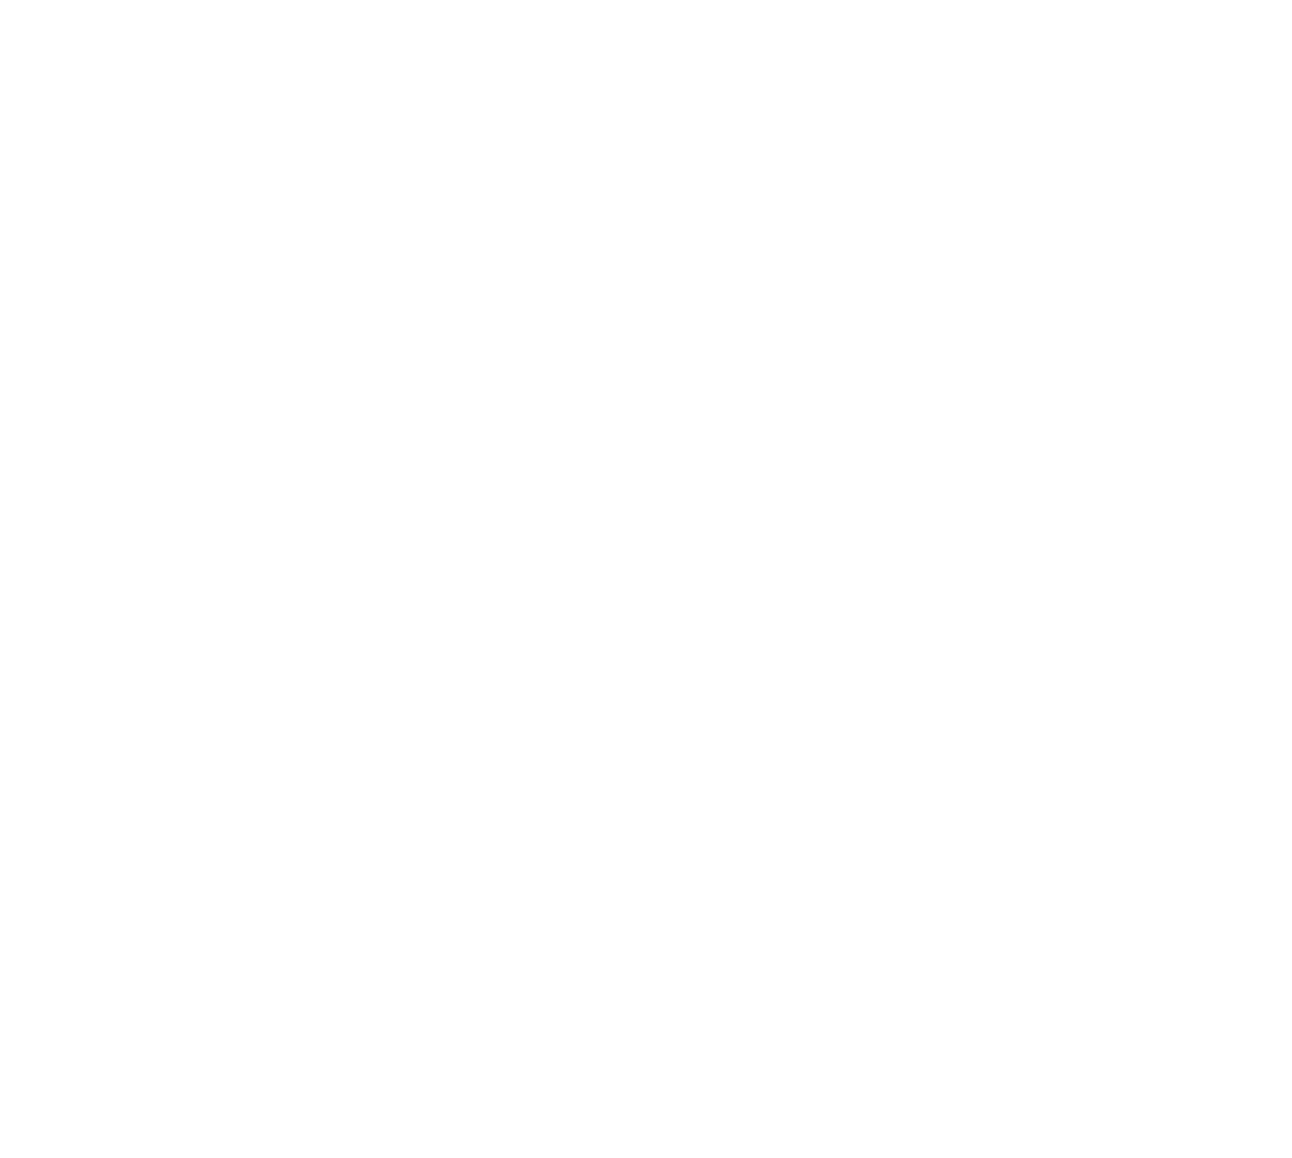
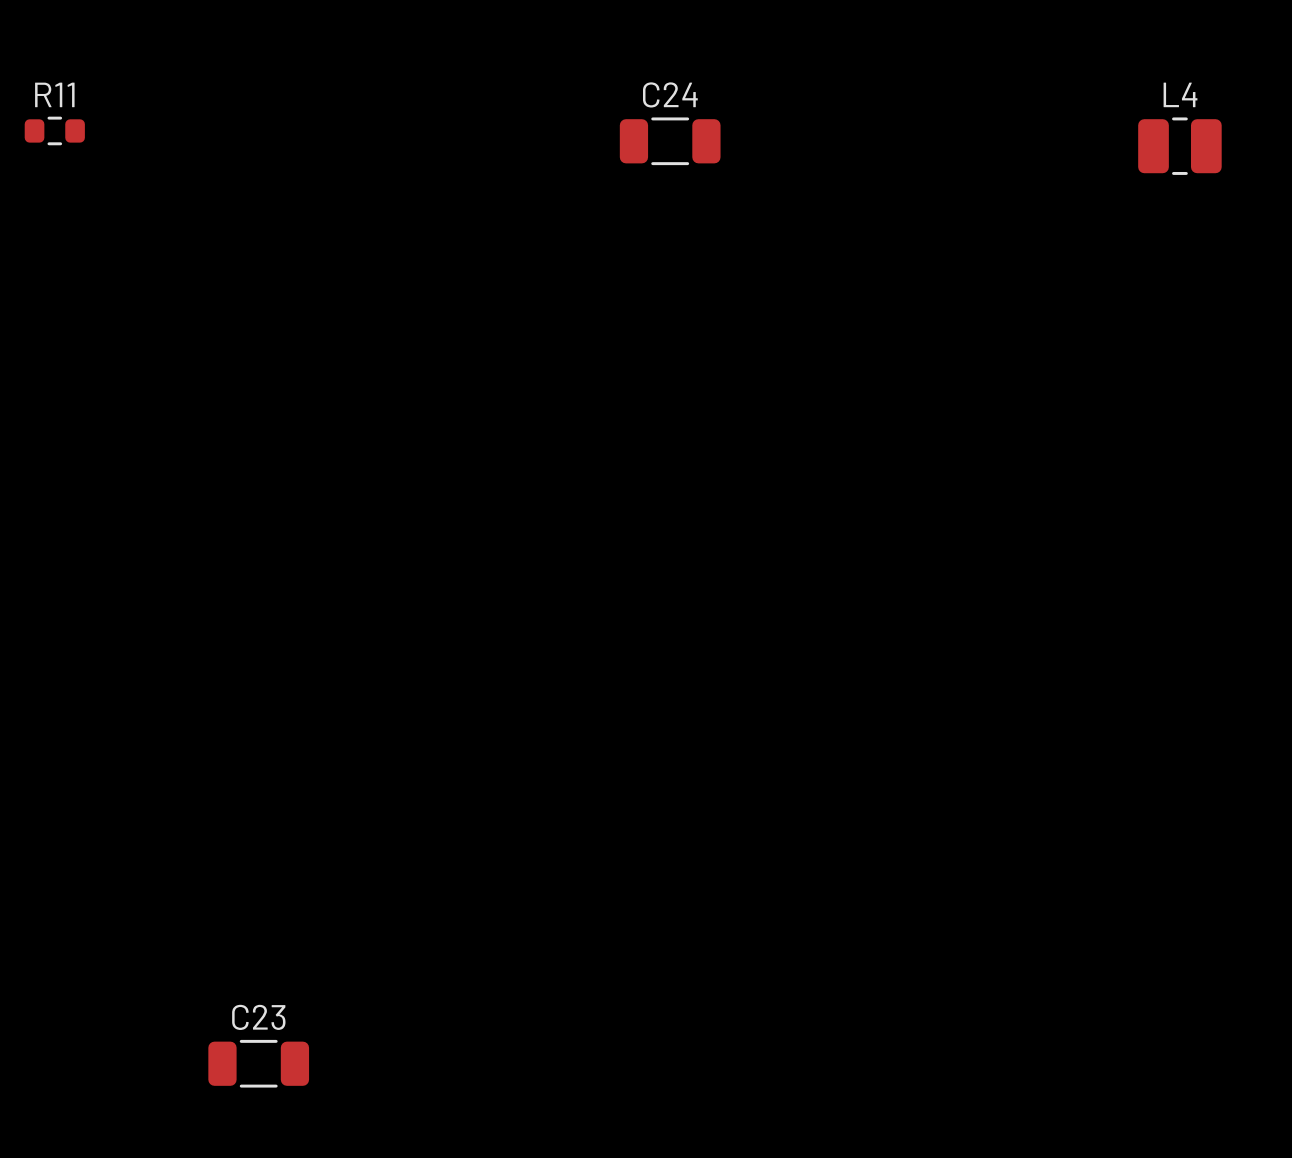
R11: none -> (54, 130)
C24: none -> (670, 141)
L4: none -> (1179, 146)
C23: none -> (258, 1063)

